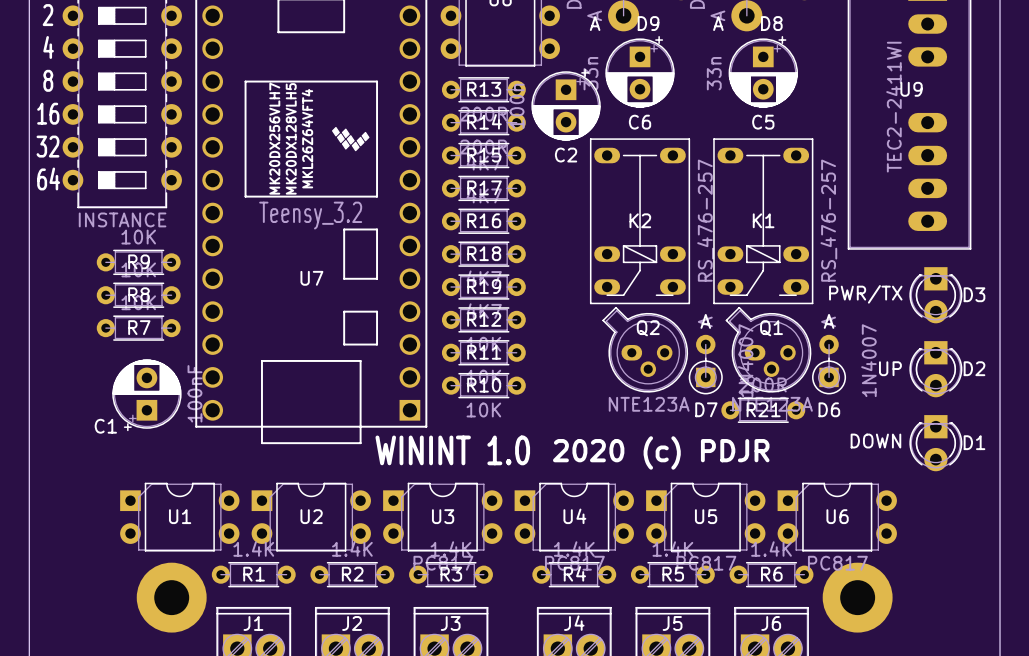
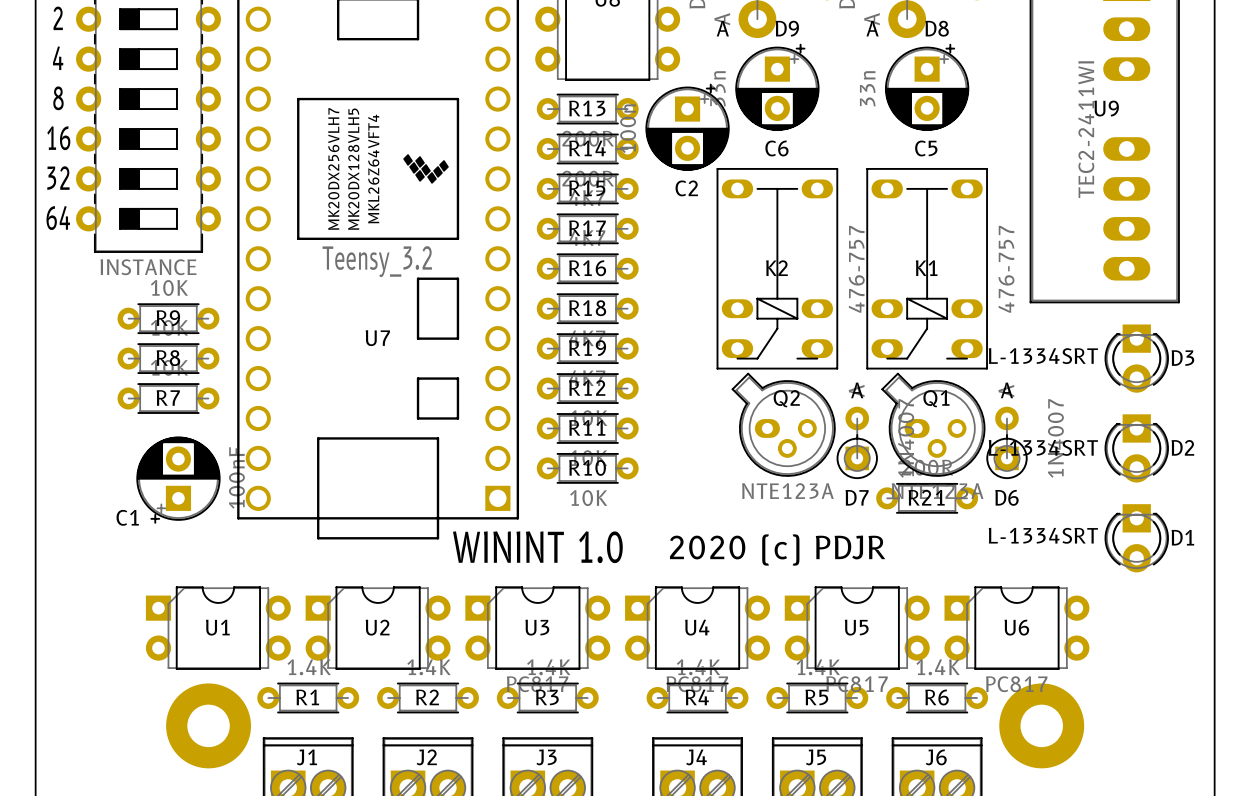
K2 value: RS_476-257 (705, 220) -> 476-757 (856, 269)
K1 value: RS_476-257 (828, 220) -> 476-757 (1006, 269)
D3 value: PWR/TX (865, 294) -> L-1334SRT (1043, 356)
D2 value: UP (890, 368) -> L-1334SRT (1043, 447)
D1 value: DOWN (875, 441) -> L-1334SRT (1043, 535)

